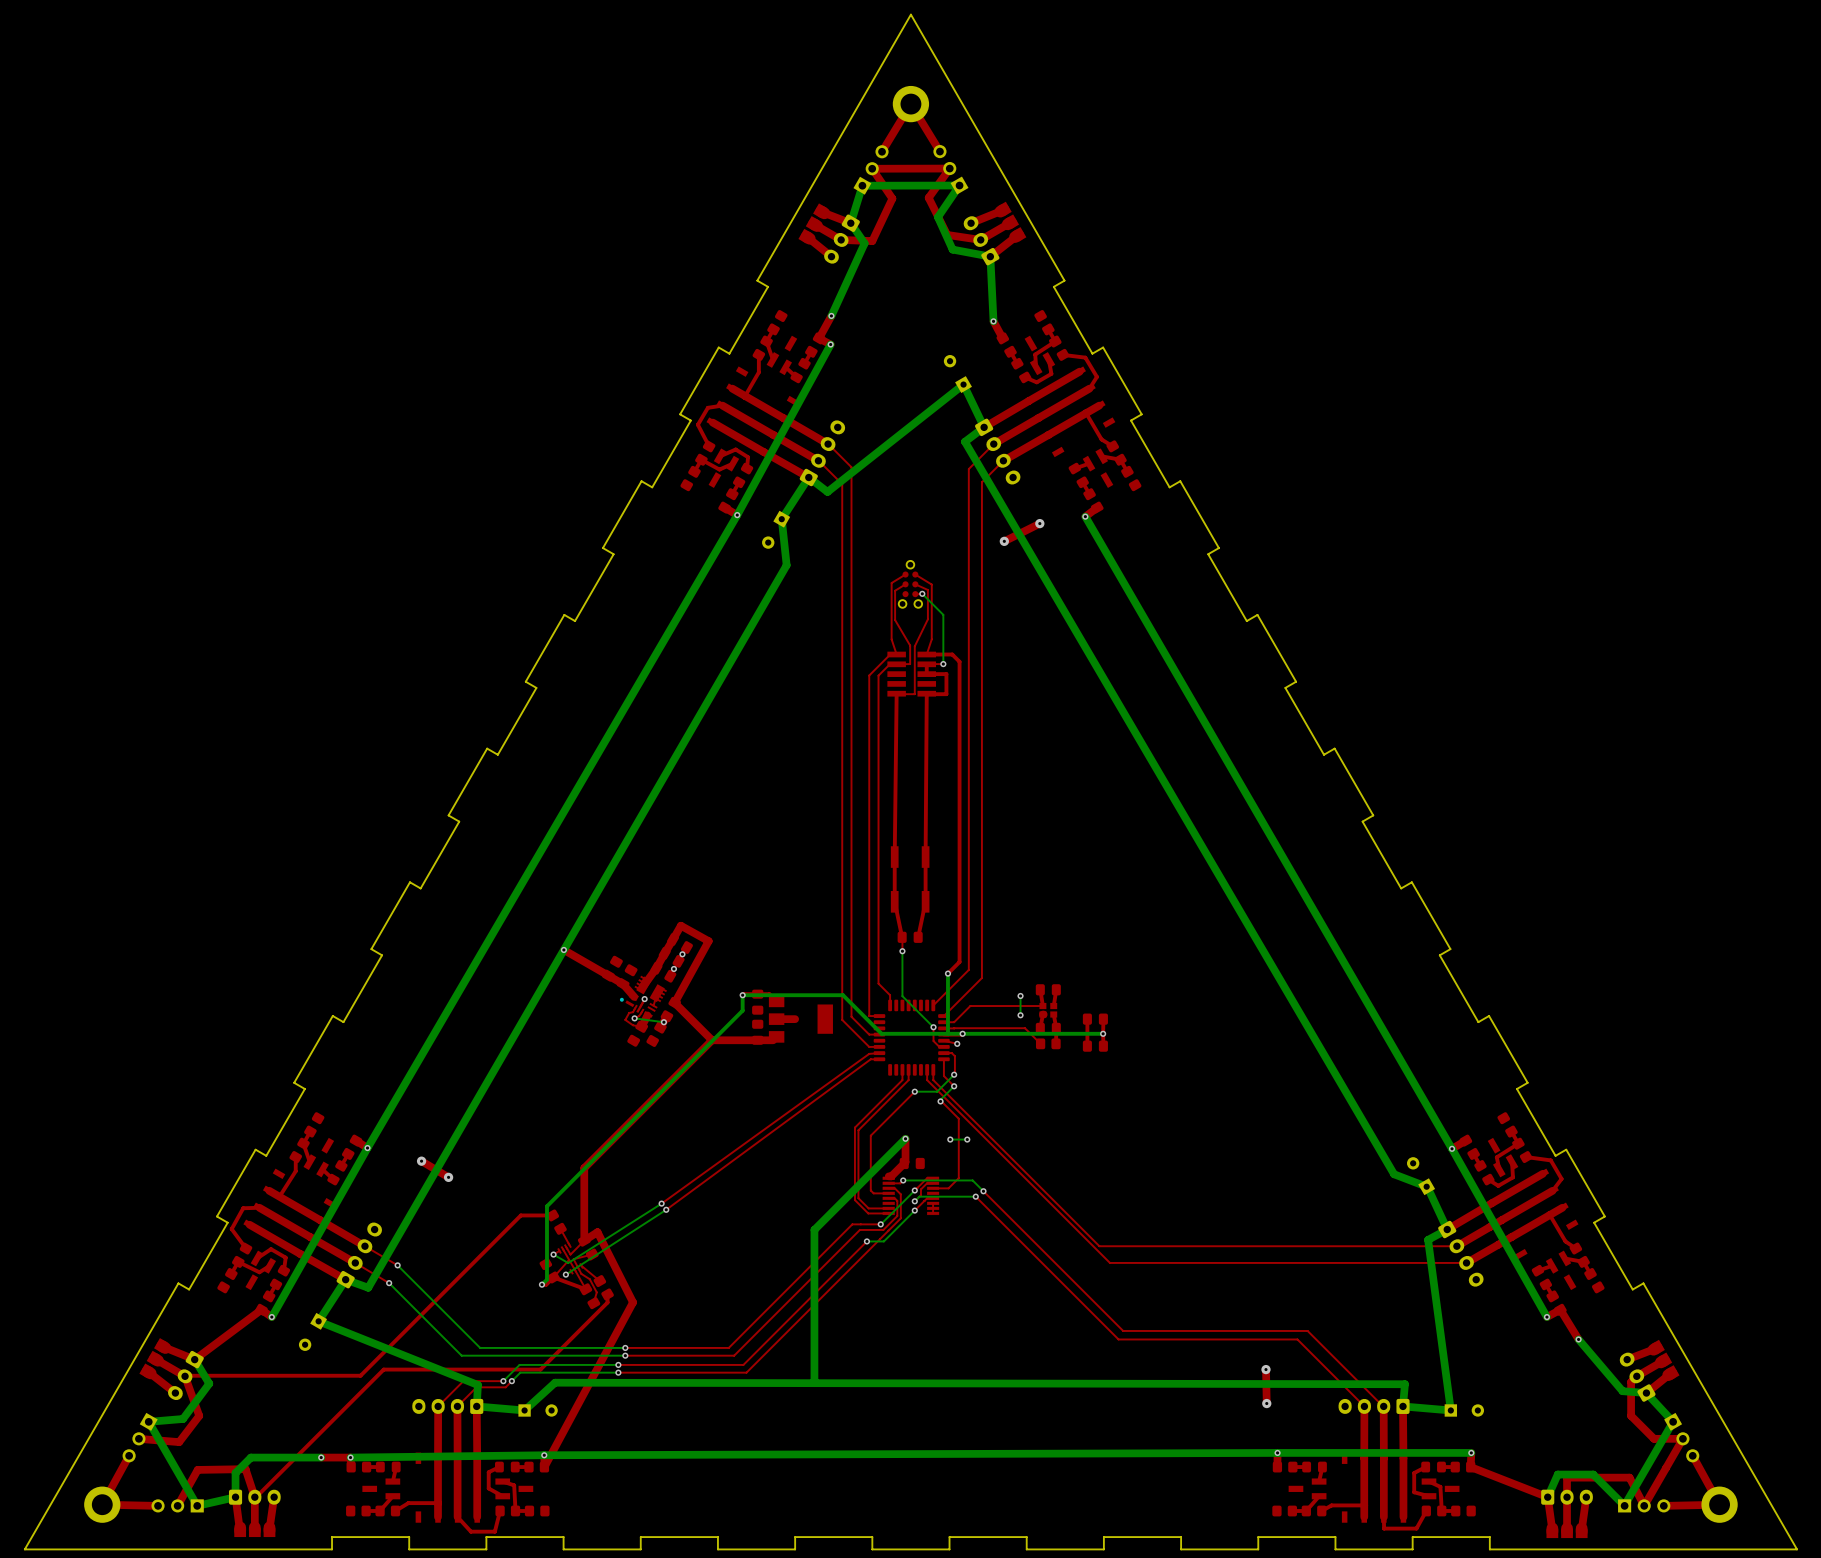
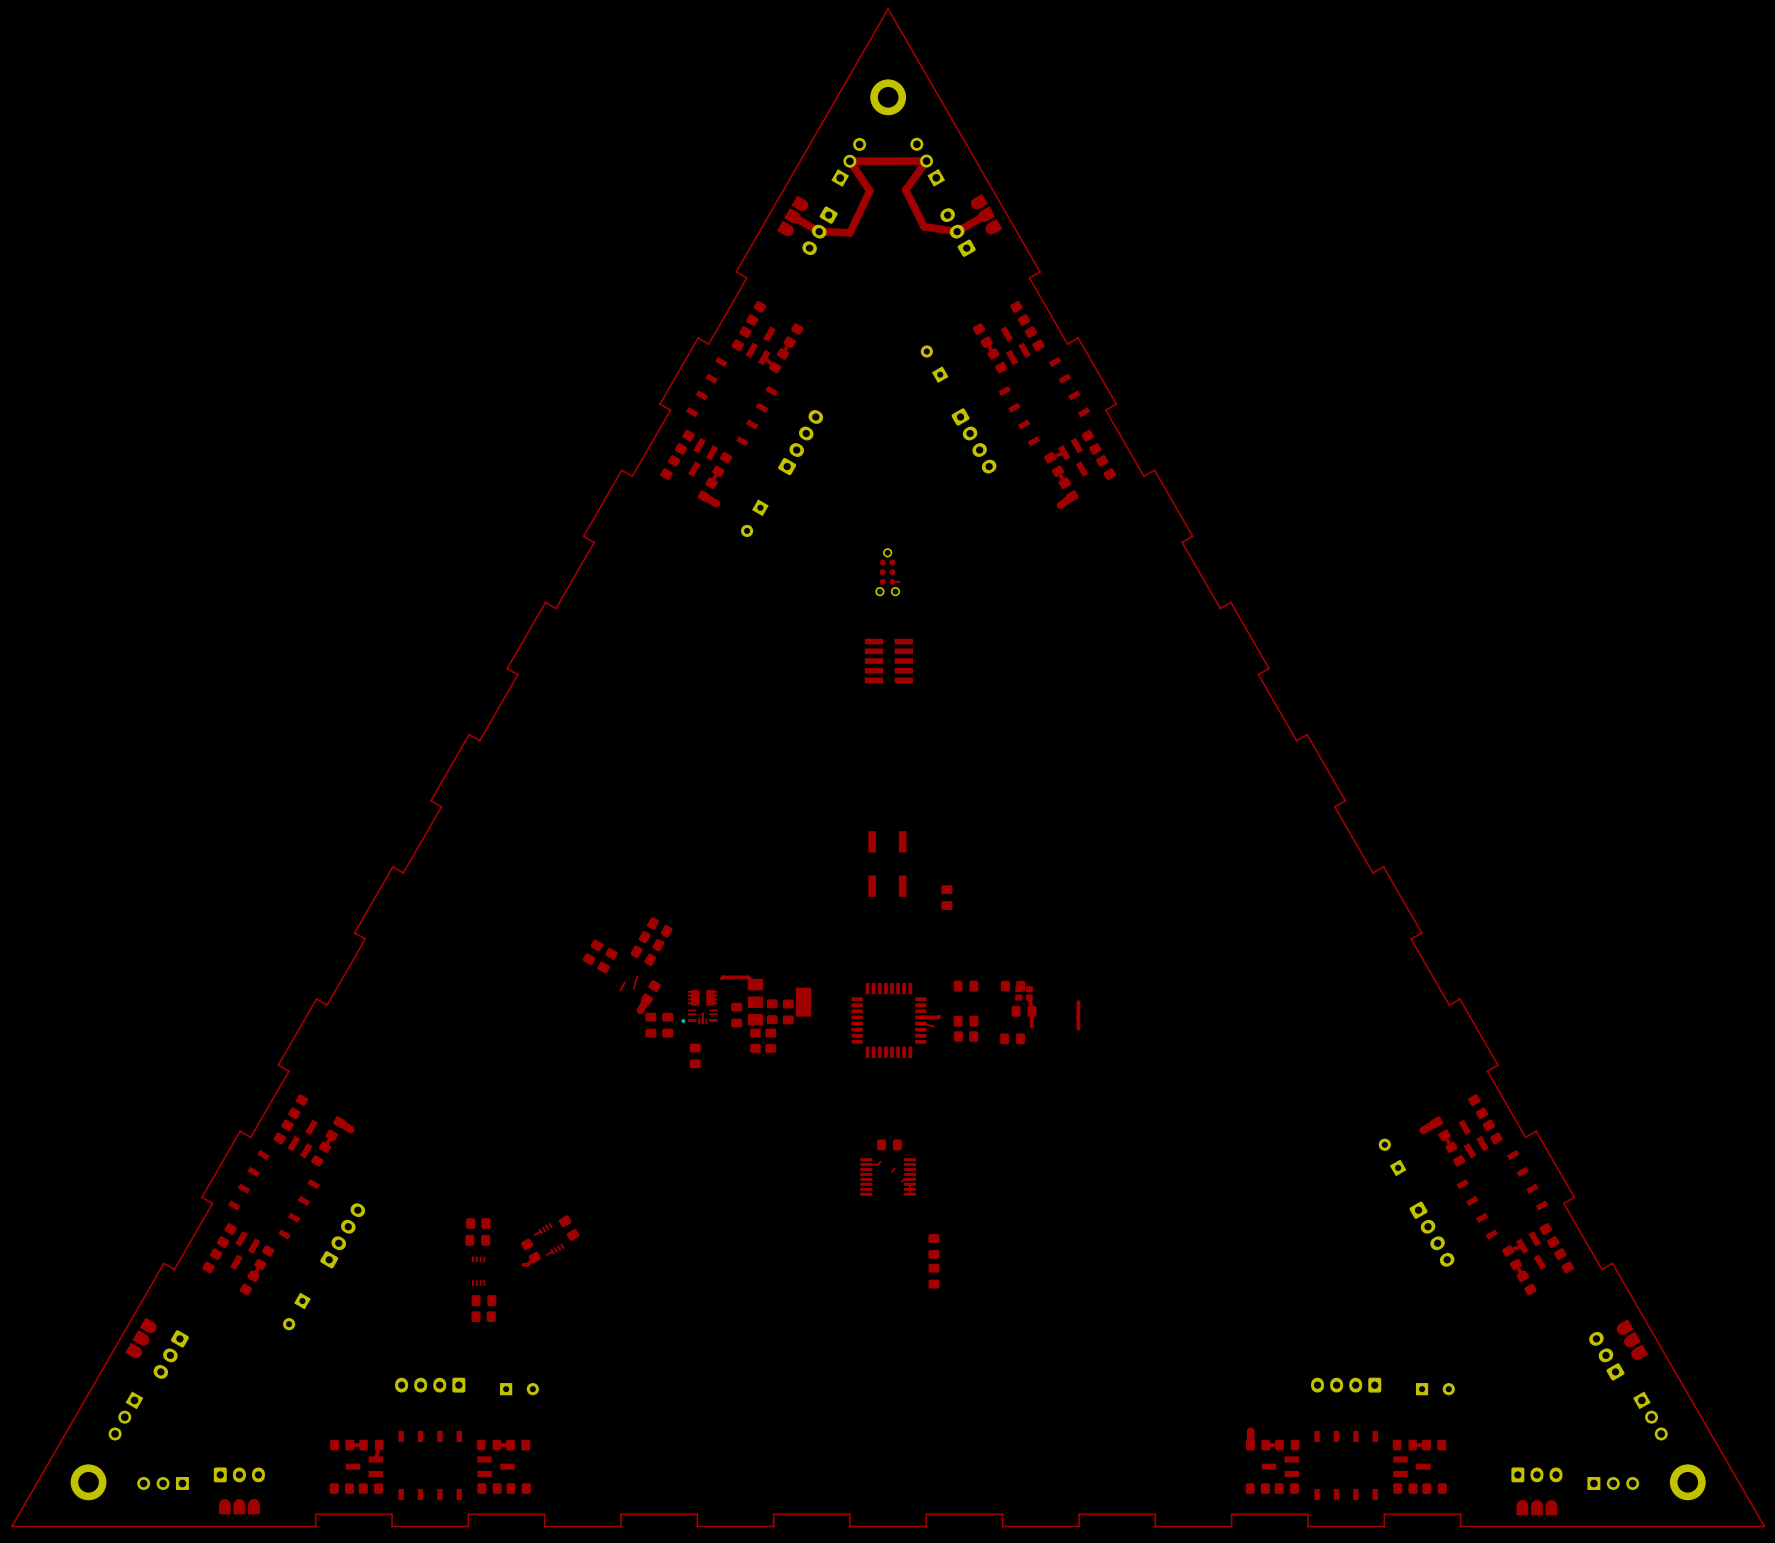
board edge: (910, 14) (1064, 280) (1053, 286) (1092, 353) (1103, 347) (1141, 414) (1131, 420) (1169, 487) (1180, 481) (1218, 548) (1208, 554) (1246, 621) (1257, 614) (1296, 681) (1285, 687) (1323, 754) (1334, 748) (1373, 815) (1362, 821) (1401, 888) (1411, 882) (1450, 949) (1439, 955) (1478, 1022) (1489, 1015) (1527, 1082) (1516, 1089) (1555, 1155) (1566, 1149) (1604, 1216) (1594, 1222) (1632, 1289) (1643, 1283) (1797, 1549) (1489, 1549) (1489, 1537) (1412, 1537) (1412, 1549) (1335, 1549) (1335, 1537) (1258, 1537) (1258, 1549) (1181, 1549) (1181, 1537) (1103, 1537) (1103, 1549) (1026, 1549) (1026, 1537) (949, 1537) (949, 1549) (872, 1549) (872, 1537) (795, 1537) (795, 1549) (717, 1549) (717, 1537) (640, 1537) (640, 1549) (563, 1549) (563, 1537) (486, 1537) (486, 1549) (409, 1549) (409, 1537) (332, 1537) (332, 1549) (24, 1549) (178, 1283) (189, 1289) (227, 1222) (217, 1216) (255, 1149) (266, 1155) (304, 1089) (294, 1082) (332, 1015) (343, 1022) (382, 955) (371, 949) (409, 882) (420, 888) (459, 821) (448, 815) (487, 748) (497, 754) (536, 687) (525, 681) (564, 614) (575, 621) (613, 554) (602, 548) (641, 481) (652, 487) (690, 420) (680, 414) (718, 347) (729, 353) (768, 286) (757, 280) (910, 14) -> none
top track: none -> (888, 8) (1040, 271) (1029, 278) (1067, 344) (1078, 338) (1116, 404) (1105, 410) (1143, 476) (1154, 470) (1192, 536) (1182, 542) (1220, 608) (1230, 602) (1269, 668) (1258, 674) (1296, 740) (1307, 734) (1345, 800) (1334, 806) (1372, 872) (1383, 866) (1421, 932) (1411, 939) (1449, 1005) (1459, 999) (1498, 1065) (1487, 1071) (1525, 1137) (1536, 1131) (1574, 1197) (1563, 1203) (1601, 1269) (1612, 1263) (1764, 1526) (1460, 1526) (1460, 1514) (1384, 1514) (1384, 1526) (1307, 1526) (1307, 1514) (1231, 1514) (1231, 1526) (1155, 1526) (1155, 1514) (1078, 1514) (1078, 1526) (1002, 1526) (1002, 1514) (926, 1514) (926, 1526) (850, 1526) (850, 1514) (773, 1514) (773, 1526) (697, 1526) (697, 1514) (621, 1514) (621, 1526) (544, 1526) (544, 1514) (468, 1514) (468, 1526) (392, 1526) (392, 1514) (315, 1514) (315, 1526) (11, 1526) (163, 1263) (174, 1269) (212, 1203) (201, 1197) (240, 1131) (250, 1137) (288, 1071) (278, 1065) (316, 999) (327, 1005) (365, 939) (354, 932) (392, 866) (403, 872) (441, 806) (430, 800) (469, 734) (479, 740) (517, 674) (507, 668) (545, 602) (556, 608) (594, 542) (583, 536) (621, 470) (632, 476) (670, 410) (659, 404) (698, 338) (708, 344) (746, 278) (736, 271) (888, 8)
top track: (939, 151) (910, 104) (882, 151) -> none
top track: (1002, 210) (971, 223) -> none
top track: (822, 212) (850, 223) -> none
top track: (1016, 236) (990, 256) -> none
top track: (808, 237) (831, 256) -> none
top track: (831, 315) (819, 338) (830, 344) -> none
bottom track: (831, 315) (864, 243) (850, 223) (862, 185) (959, 185) (937, 217) (952, 249) (990, 256) (993, 321) -> none
via: (831, 315) -> none
top track: (993, 321) (1002, 338) -> none
via: (993, 321) -> none
top track: (773, 329) (766, 341) (772, 359) -> none
top track: (1048, 329) (1055, 341) (1035, 354) (1036, 367) -> none
bottom track: (830, 344) (737, 515) (367, 1148) (271, 1317) -> none
via: (830, 344) -> none
top track: (758, 354) (758, 372) (745, 396) -> none
top track: (1062, 354) (1085, 357) (1096, 376) (1089, 388) (993, 444) (968, 469) (968, 969) (933, 1005) -> none
top track: (1048, 359) (1051, 373) (1036, 382) (1025, 377) -> none
top track: (1079, 371) (984, 427) -> none
bottom track: (963, 384) (827, 491) (808, 477) (781, 519) (786, 565) (368, 1287) (345, 1279) (318, 1321) (477, 1385) (476, 1406) (524, 1410) (555, 1382) (1404, 1384) (1403, 1406) (1450, 1410) (1428, 1239) (1447, 1229) (1426, 1185) (1426, 1186) (1394, 1174) (964, 441) (984, 427) (963, 384) -> none
top track: (732, 388) (828, 444) (851, 467) (851, 1016) (869, 1034) (879, 1034) -> none
top track: (1099, 405) (1003, 460) (981, 482) (981, 978) (943, 1016) -> none
top track: (1086, 413) (1101, 439) (1112, 446) -> none
top track: (712, 422) (808, 477) -> none
top track: (709, 446) (697, 424) (707, 407) (722, 405) (818, 460) (842, 484) (842, 1019) (869, 1046) (879, 1046) -> none
top track: (720, 456) (735, 449) (748, 457) (747, 468) -> none
top track: (1101, 456) (1120, 459) (1127, 471) -> none
top track: (732, 463) (719, 469) (701, 459) (694, 471) -> none
via: (737, 515) -> none
bottom track: (1085, 516) (1452, 1148) (1546, 1317) -> none
via: (1085, 516) -> none
top track: (1039, 523) (1004, 541) -> none
via: (1039, 523) -> none
via: (1004, 541) -> none
top track: (905, 574) (891, 583) (891, 639) (896, 654) (890, 654) (869, 675) (869, 1016) (879, 1016) -> none
top track: (915, 574) (931, 584) (931, 639) (926, 654) (952, 654) (959, 661) (959, 962) (947, 973) -> none
top track: (905, 584) (895, 590) (895, 620) (910, 645) (910, 664) (889, 664) (878, 675) (878, 983) (890, 995) (890, 1005) -> none
top track: (915, 584) (927, 589) (927, 619) (914, 646) (914, 694) (896, 693) (894, 901) (902, 937) (902, 951) -> none
bottom track: (922, 593) (943, 614) (943, 664) -> none
via: (922, 593) -> none
top track: (943, 664) (926, 664) (926, 674) (946, 674) (946, 694) (926, 693) (925, 901) (918, 937) -> none
via: (943, 664) -> none
part: none -> (946, 897)
part: (910, 937) -> none
top track: (563, 949) (623, 984) (634, 996) -> none
via: (563, 949) -> none
bottom track: (902, 951) (902, 996) (933, 1027) -> none
via: (902, 951) -> none
via: (682, 954) -> none
via: (673, 968) -> none
bottom track: (947, 973) (947, 1033) -> none
via: (947, 973) -> none
top track: (643, 985) (656, 968) (680, 925) (708, 941) (674, 1002) (712, 1040) -> none
top track: (1040, 989) (1042, 1006) (970, 1006) (954, 1022) (943, 1022) -> none
part: (1048, 989) -> none
top track: (1056, 989) (1053, 1006) -> none
via: (742, 995) -> none
bottom track: (1020, 995) (1020, 1015) -> none
via: (1020, 995) -> none
part: (643, 996) -> none
via: (644, 999) -> none
part: (757, 1002) -> none
part: none -> (966, 986)
part: none -> (1013, 986)
top track: (635, 1007) (625, 1019) (633, 1025) (641, 1026) (647, 1015) -> none
top track: (642, 1011) (634, 1018) -> none
top track: (1043, 1014) (1040, 1028) -> none
via: (1020, 1015) -> none
bottom track: (634, 1018) (663, 1022) -> none
via: (634, 1018) -> none
top track: (795, 1019) (776, 1019) -> none
top track: (1087, 1019) (1087, 1046) -> none
part: (1095, 1019) -> none
via: (663, 1022) -> none
part: none -> (699, 1007)
top track: (933, 1027) (933, 1041) (939, 1046) (943, 1046) -> none
via: (933, 1027) -> none
part: none -> (772, 1011)
top track: (943, 1028) (1024, 1028) (1040, 1043) -> none
part: none -> (788, 1011)
part: (637, 1033) -> none
via: (962, 1033) -> none
bottom track: (1103, 1033) (881, 1033) (843, 995) (742, 995) (742, 1010) (546, 1206) (546, 1279) (541, 1284) -> none
via: (1103, 1033) -> none
part: (656, 1034) -> none
top track: (776, 1036) (773, 1040) (712, 1040) -> none
part: none -> (966, 1021)
top track: (712, 1040) (584, 1168) (584, 1240) -> none
part: none -> (650, 1025)
part: none -> (667, 1025)
via: (957, 1043) -> none
part: (1048, 1043) -> none
part: (1095, 1046) -> none
top track: (879, 1053) (869, 1053) (661, 1203) -> none
top track: (943, 1053) (951, 1053) (954, 1056) (954, 1074) -> none
part: none -> (966, 1036)
part: none -> (1012, 1038)
part: none -> (755, 1040)
part: none -> (770, 1040)
top track: (879, 1059) (870, 1059) (666, 1209) -> none
top track: (943, 1059) (943, 1076) (954, 1086) -> none
top track: (902, 1069) (902, 1080) (854, 1127) (854, 1200) (868, 1213) (888, 1213) -> none
top track: (908, 1069) (908, 1080) (858, 1130) (858, 1198) (868, 1208) (888, 1208) -> none
top track: (927, 1069) (927, 1080) (1109, 1262) (1466, 1262) (1562, 1207) -> none
top track: (933, 1069) (933, 1080) (1099, 1246) (1456, 1246) (1552, 1190) (1561, 1178) (1550, 1160) (1526, 1157) -> none
part: none -> (695, 1055)
bottom track: (954, 1074) (937, 1091) (914, 1091) -> none
via: (954, 1074) -> none
bottom track: (954, 1086) (940, 1101) -> none
via: (954, 1086) -> none
top track: (914, 1091) (870, 1135) (870, 1190) (873, 1193) (888, 1193) -> none
via: (914, 1091) -> none
top track: (940, 1101) (958, 1118) (958, 1178) (948, 1188) (933, 1188) -> none
via: (940, 1101) -> none
top track: (310, 1131) (303, 1143) (309, 1162) -> none
top track: (1511, 1131) (1518, 1143) (1496, 1157) (1499, 1169) -> none
top track: (905, 1138) (905, 1162) (891, 1176) (888, 1176) -> none
bottom track: (905, 1138) (814, 1229) (814, 1383) -> none
via: (905, 1138) -> none
via: (950, 1139) -> none
bottom track: (967, 1139) (950, 1139) -> none
via: (967, 1139) -> none
via: (367, 1148) -> none
via: (1452, 1148) -> none
top track: (295, 1157) (295, 1171) (279, 1196) -> none
top track: (421, 1161) (448, 1177) -> none
via: (421, 1161) -> none
top track: (1512, 1162) (1512, 1177) (1498, 1185) (1488, 1179) -> none
top track: (322, 1169) (333, 1179) -> none
top track: (1542, 1173) (1447, 1229) -> none
via: (448, 1177) -> none
top track: (933, 1178) (927, 1178) (917, 1187) -> none
bottom track: (903, 1180) (972, 1180) (983, 1191) -> none
via: (903, 1180) -> none
top track: (933, 1183) (927, 1183) (920, 1189) (920, 1195) (914, 1201) -> none
top track: (888, 1188) (894, 1188) (900, 1194) (900, 1218) (746, 1372) (618, 1372) -> none
top track: (269, 1190) (397, 1265) -> none
bottom track: (914, 1190) (880, 1224) -> none
via: (914, 1190) -> none
top track: (983, 1191) (1123, 1330) (1307, 1330) (1383, 1406) (1384, 1528) (1416, 1528) (1426, 1510) -> none
via: (983, 1191) -> none
top track: (975, 1196) (1118, 1339) (1297, 1339) (1364, 1406) (1364, 1517) -> none
bottom track: (975, 1196) (919, 1196) (914, 1201) -> none
via: (975, 1196) -> none
top track: (888, 1198) (894, 1198) (897, 1200) (897, 1215) (883, 1229) (860, 1229) -> none
top track: (924, 1200) (914, 1210) -> none
via: (914, 1201) -> none
bottom track: (661, 1203) (568, 1263) (553, 1254) -> none
via: (661, 1203) -> none
bottom track: (666, 1209) (565, 1274) -> none
via: (666, 1209) -> none
bottom track: (914, 1210) (883, 1241) (866, 1241) -> none
via: (914, 1210) -> none
top track: (552, 1215) (520, 1215) (360, 1375) (185, 1376) -> none
top track: (1549, 1215) (1565, 1241) (1575, 1248) -> none
part: (556, 1222) -> none
top track: (249, 1224) (345, 1279) -> none
top track: (880, 1224) (852, 1224) (728, 1347) (625, 1347) -> none
via: (880, 1224) -> none
top track: (560, 1228) (569, 1245) -> none
top track: (859, 1229) (734, 1355) (625, 1355) -> none
top track: (584, 1240) (597, 1232) (633, 1302) (544, 1467) (544, 1455) -> none
top track: (584, 1240) (570, 1254) (566, 1247) -> none
top track: (866, 1241) (743, 1364) (618, 1364) -> none
via: (866, 1241) -> none
part: none -> (478, 1223)
top track: (246, 1248) (231, 1229) (243, 1208) (259, 1207) (389, 1283) -> none
top track: (562, 1249) (574, 1269) (585, 1289) (553, 1277) (569, 1259) -> none
via: (553, 1254) -> none
top track: (592, 1254) (573, 1259) (581, 1273) (589, 1279) (596, 1292) (593, 1303) -> none
top track: (257, 1258) (271, 1249) (285, 1257) (283, 1270) -> none
top track: (1564, 1258) (1583, 1261) (1590, 1273) -> none
part: none -> (477, 1240)
top track: (269, 1265) (259, 1272) (238, 1261) (231, 1273) -> none
bottom track: (397, 1265) (480, 1347) (625, 1347) -> none
via: (397, 1265) -> none
top track: (581, 1265) (599, 1281) -> none
part: none -> (933, 1246)
via: (565, 1274) -> none
bottom track: (389, 1283) (461, 1355) (625, 1355) -> none
via: (389, 1283) -> none
via: (541, 1284) -> none
part: (603, 1287) -> none
part: none -> (478, 1271)
top track: (607, 1294) (607, 1302) (540, 1369) (383, 1369) (254, 1497) -> none
part: (589, 1296) -> none
part: none -> (933, 1276)
top track: (271, 1317) (261, 1309) (194, 1359) (163, 1347) -> none
via: (271, 1317) -> none
top track: (1546, 1317) (1560, 1309) (1578, 1339) -> none
via: (1546, 1317) -> none
part: none -> (483, 1300)
part: none -> (483, 1316)
bottom track: (1578, 1339) (1622, 1391) (1646, 1393) (1673, 1421) (1624, 1506) (1593, 1474) (1557, 1474) (1547, 1497) -> none
via: (1578, 1339) -> none
via: (625, 1347) -> none
top track: (1655, 1348) (1627, 1359) -> none
via: (625, 1355) -> none
top track: (153, 1358) (185, 1376) -> none
bottom track: (194, 1359) (209, 1383) (183, 1418) (148, 1421) (197, 1505) (235, 1497) (235, 1473) (250, 1457) (321, 1457) -> none
top track: (1662, 1361) (1636, 1376) (1631, 1382) (1631, 1415) (1654, 1438) (1682, 1438) (1644, 1505) (1629, 1477) (1567, 1477) (1567, 1530) -> none
bottom track: (618, 1364) (519, 1364) (503, 1381) -> none
via: (618, 1364) -> none
top track: (1265, 1369) (1266, 1403) -> none
via: (1265, 1369) -> none
top track: (149, 1372) (175, 1393) -> none
bottom track: (618, 1372) (520, 1372) (511, 1381) -> none
via: (618, 1372) -> none
top track: (1669, 1374) (1646, 1393) -> none
top track: (185, 1376) (199, 1415) (179, 1442) (138, 1438) -> none
top track: (503, 1381) (463, 1381) (438, 1406) (438, 1517) -> none
via: (503, 1381) -> none
top track: (511, 1381) (505, 1387) (476, 1387) (457, 1406) (457, 1517) (470, 1531) (494, 1531) (500, 1510) -> none
via: (511, 1381) -> none
via: (1266, 1403) -> none
top track: (476, 1406) (477, 1517) -> none
top track: (1403, 1406) (1403, 1517) -> none
via: (1277, 1452) -> none
top track: (1471, 1452) (1470, 1467) (1547, 1497) (1552, 1530) -> none
bottom track: (1471, 1452) (544, 1455) (350, 1457) -> none
via: (1471, 1452) -> none
top track: (129, 1455) (102, 1504) (158, 1505) -> none
via: (544, 1455) -> none
top track: (1692, 1455) (1719, 1504) (1663, 1505) -> none
top track: (321, 1457) (350, 1457) (351, 1467) -> none
via: (321, 1457) -> none
via: (350, 1457) -> none
top track: (499, 1467) (488, 1472) (488, 1488) (502, 1496) -> none
top track: (1322, 1467) (1319, 1481) -> none
top track: (1425, 1467) (1414, 1473) (1414, 1492) (1428, 1496) -> none
top track: (502, 1481) (514, 1485) (515, 1510) (529, 1511) -> none
top track: (1428, 1481) (1440, 1486) (1441, 1510) (1455, 1511) -> none
top track: (392, 1496) (380, 1510) (366, 1511) -> none
top track: (1319, 1496) (1306, 1510) (1292, 1511) -> none
top track: (235, 1497) (240, 1532) -> none
top track: (254, 1497) (254, 1529) -> none
top track: (254, 1497) (245, 1469) (197, 1469) (177, 1505) -> none
top track: (274, 1497) (269, 1529) -> none
top track: (1586, 1497) (1581, 1530) -> none
top track: (438, 1503) (408, 1503) (395, 1510) -> none
top track: (1364, 1505) (1331, 1505) (1321, 1510) -> none

